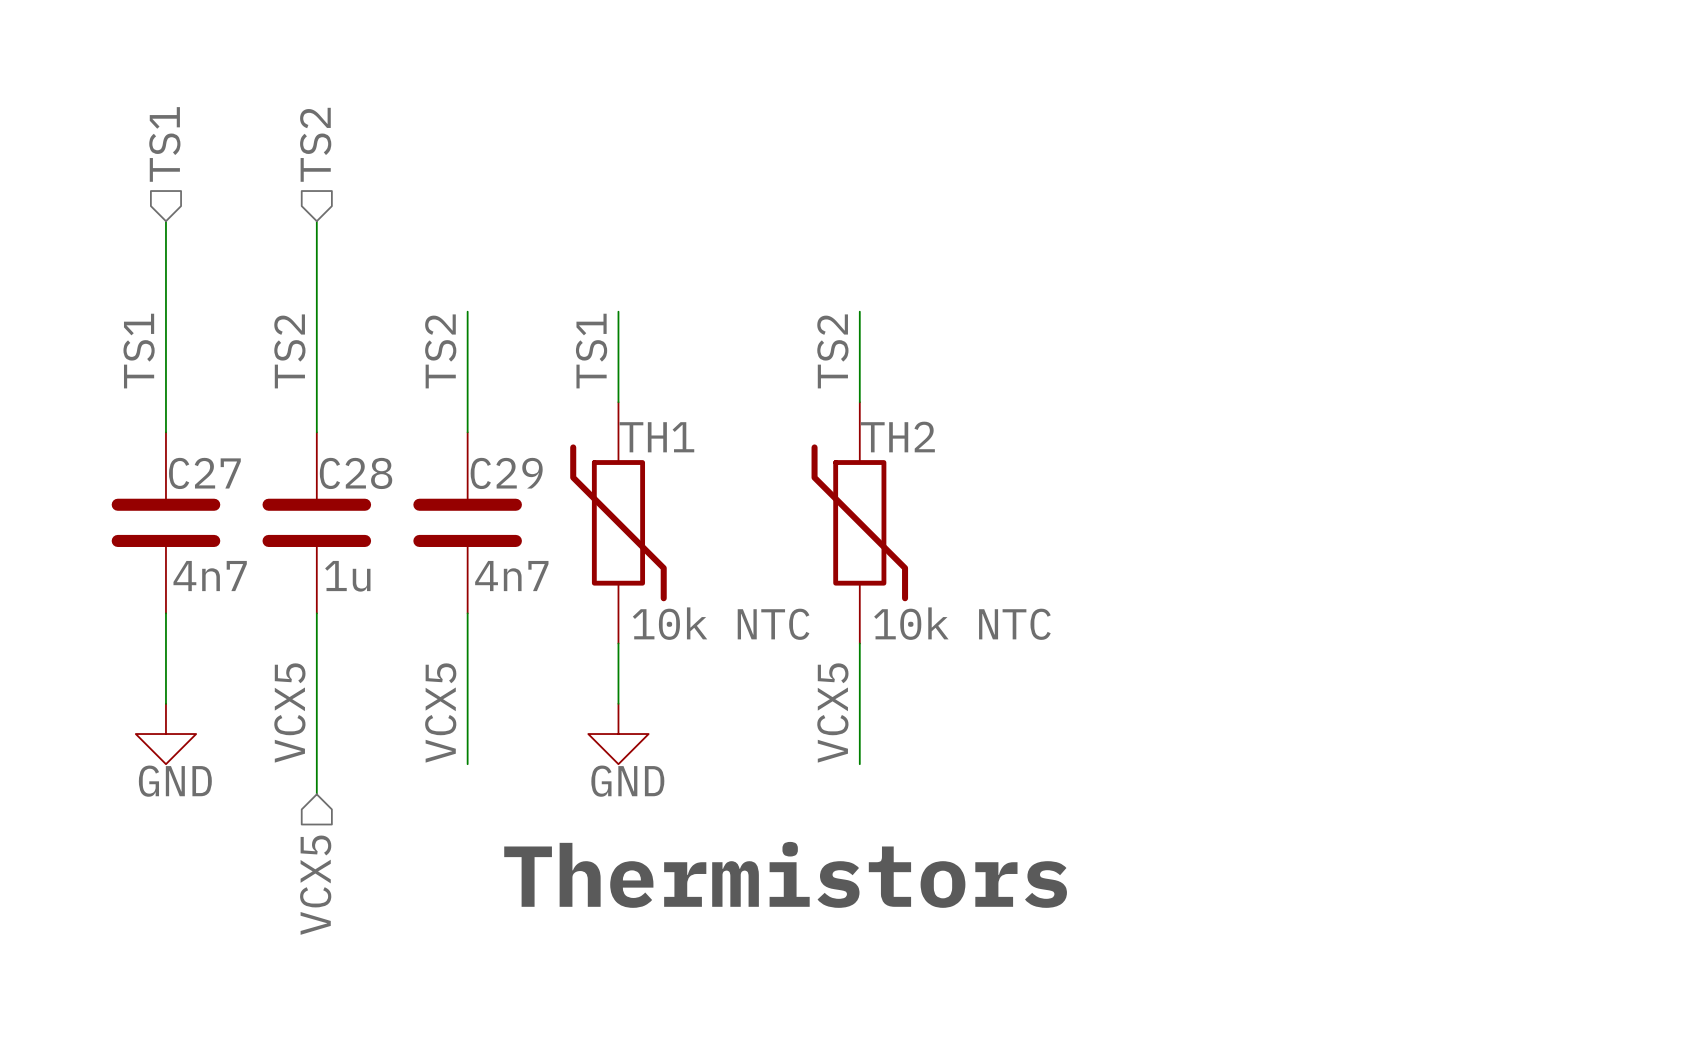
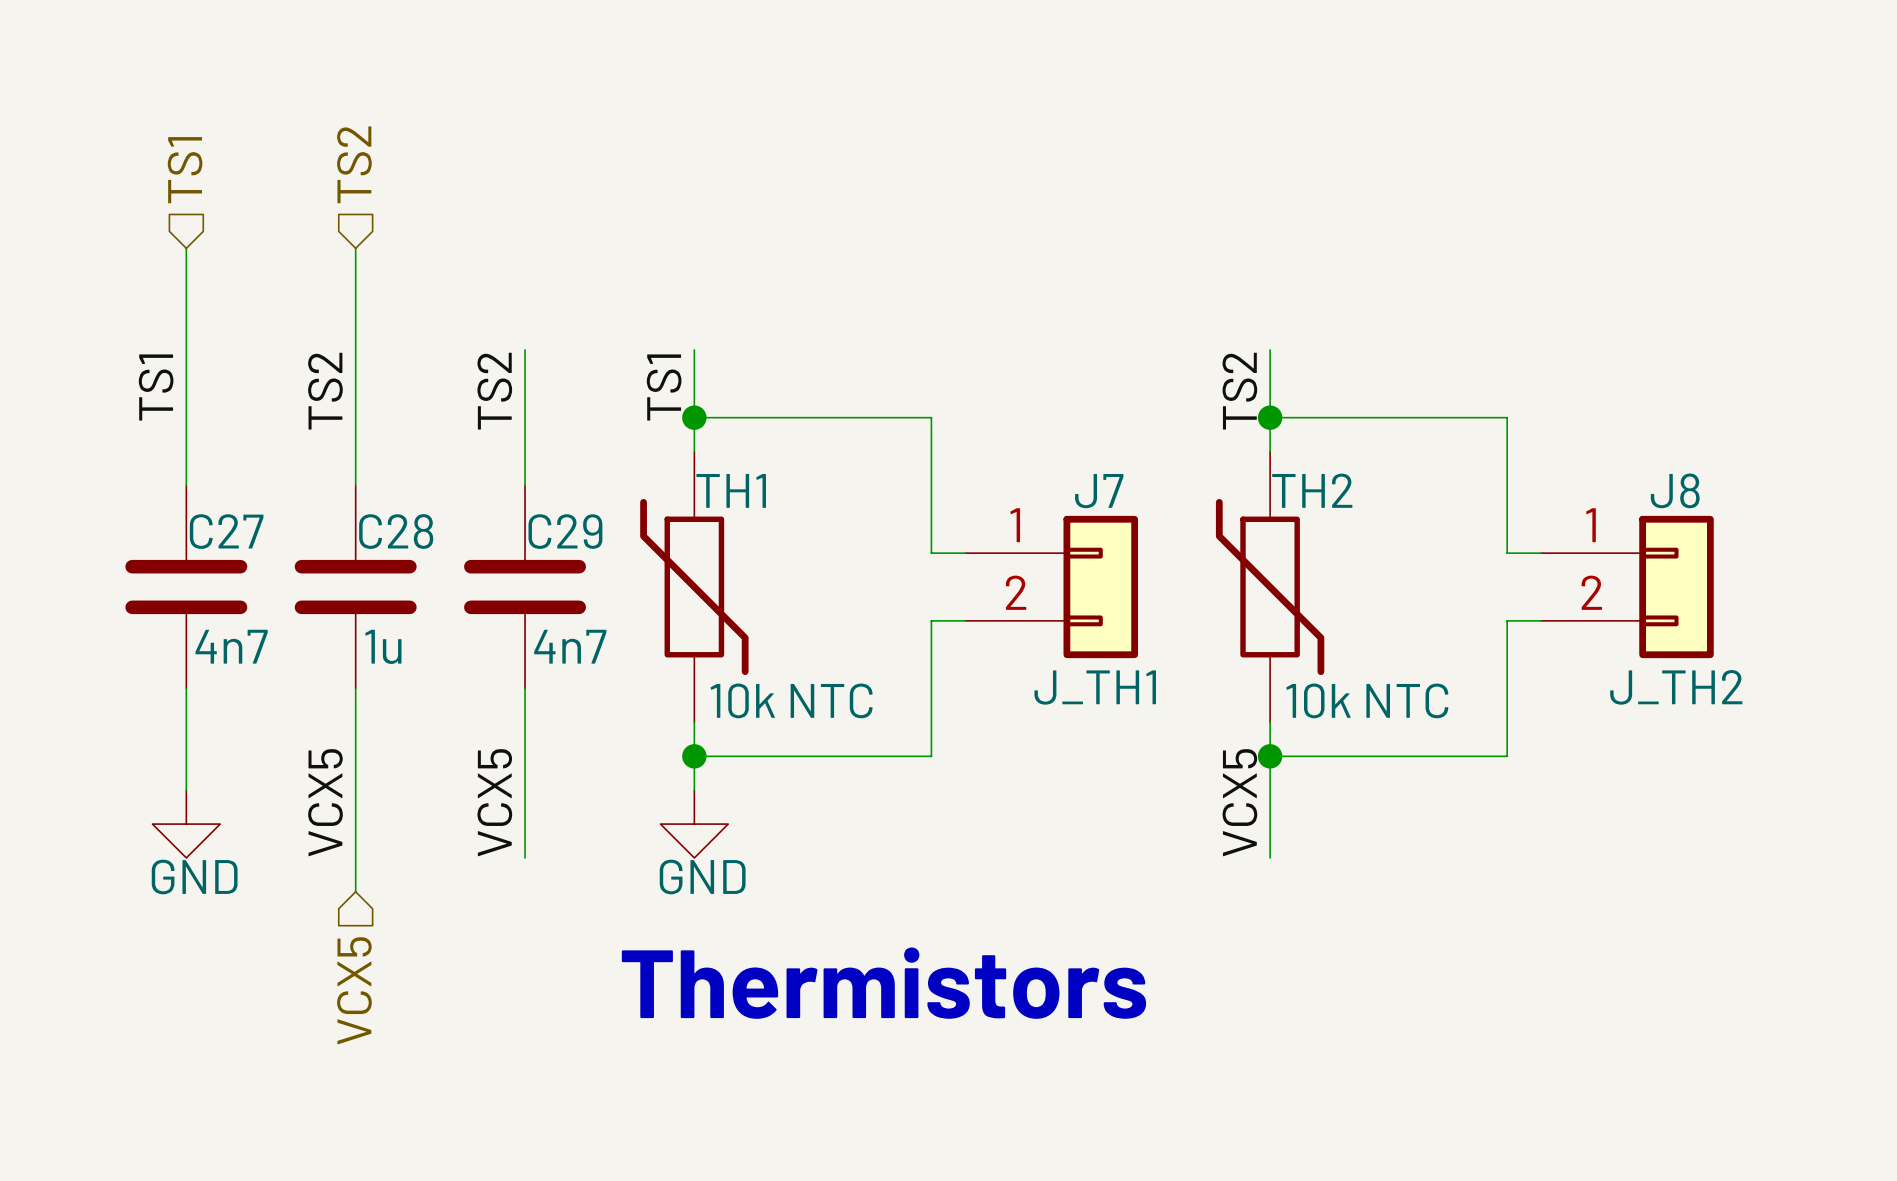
wire: (859, 311) (859, 402) -> (1270, 349) (1270, 451)
label position: TS2 (832, 351) -> TS2 (1239, 391)
wire: none -> (694, 417) (931, 417) (931, 553) (965, 553)
junction: none -> (694, 417)
wire: none -> (1270, 417) (1507, 417) (1507, 553) (1541, 553)
junction: none -> (1270, 417)
TH2 position: (859, 522) -> (1270, 587)
J7: none -> J_TH1 (1051, 587)
J8: none -> J_TH2 (1627, 587)
wire: none -> (965, 620) (931, 620) (931, 756) (694, 756)
wire: none -> (1541, 620) (1507, 620) (1507, 756) (1270, 756)
wire: (859, 643) (859, 764) -> (1270, 722) (1270, 857)
junction: none -> (694, 756)
junction: none -> (1270, 756)
label position: VCX5 (832, 712) -> VCX5 (1239, 802)

